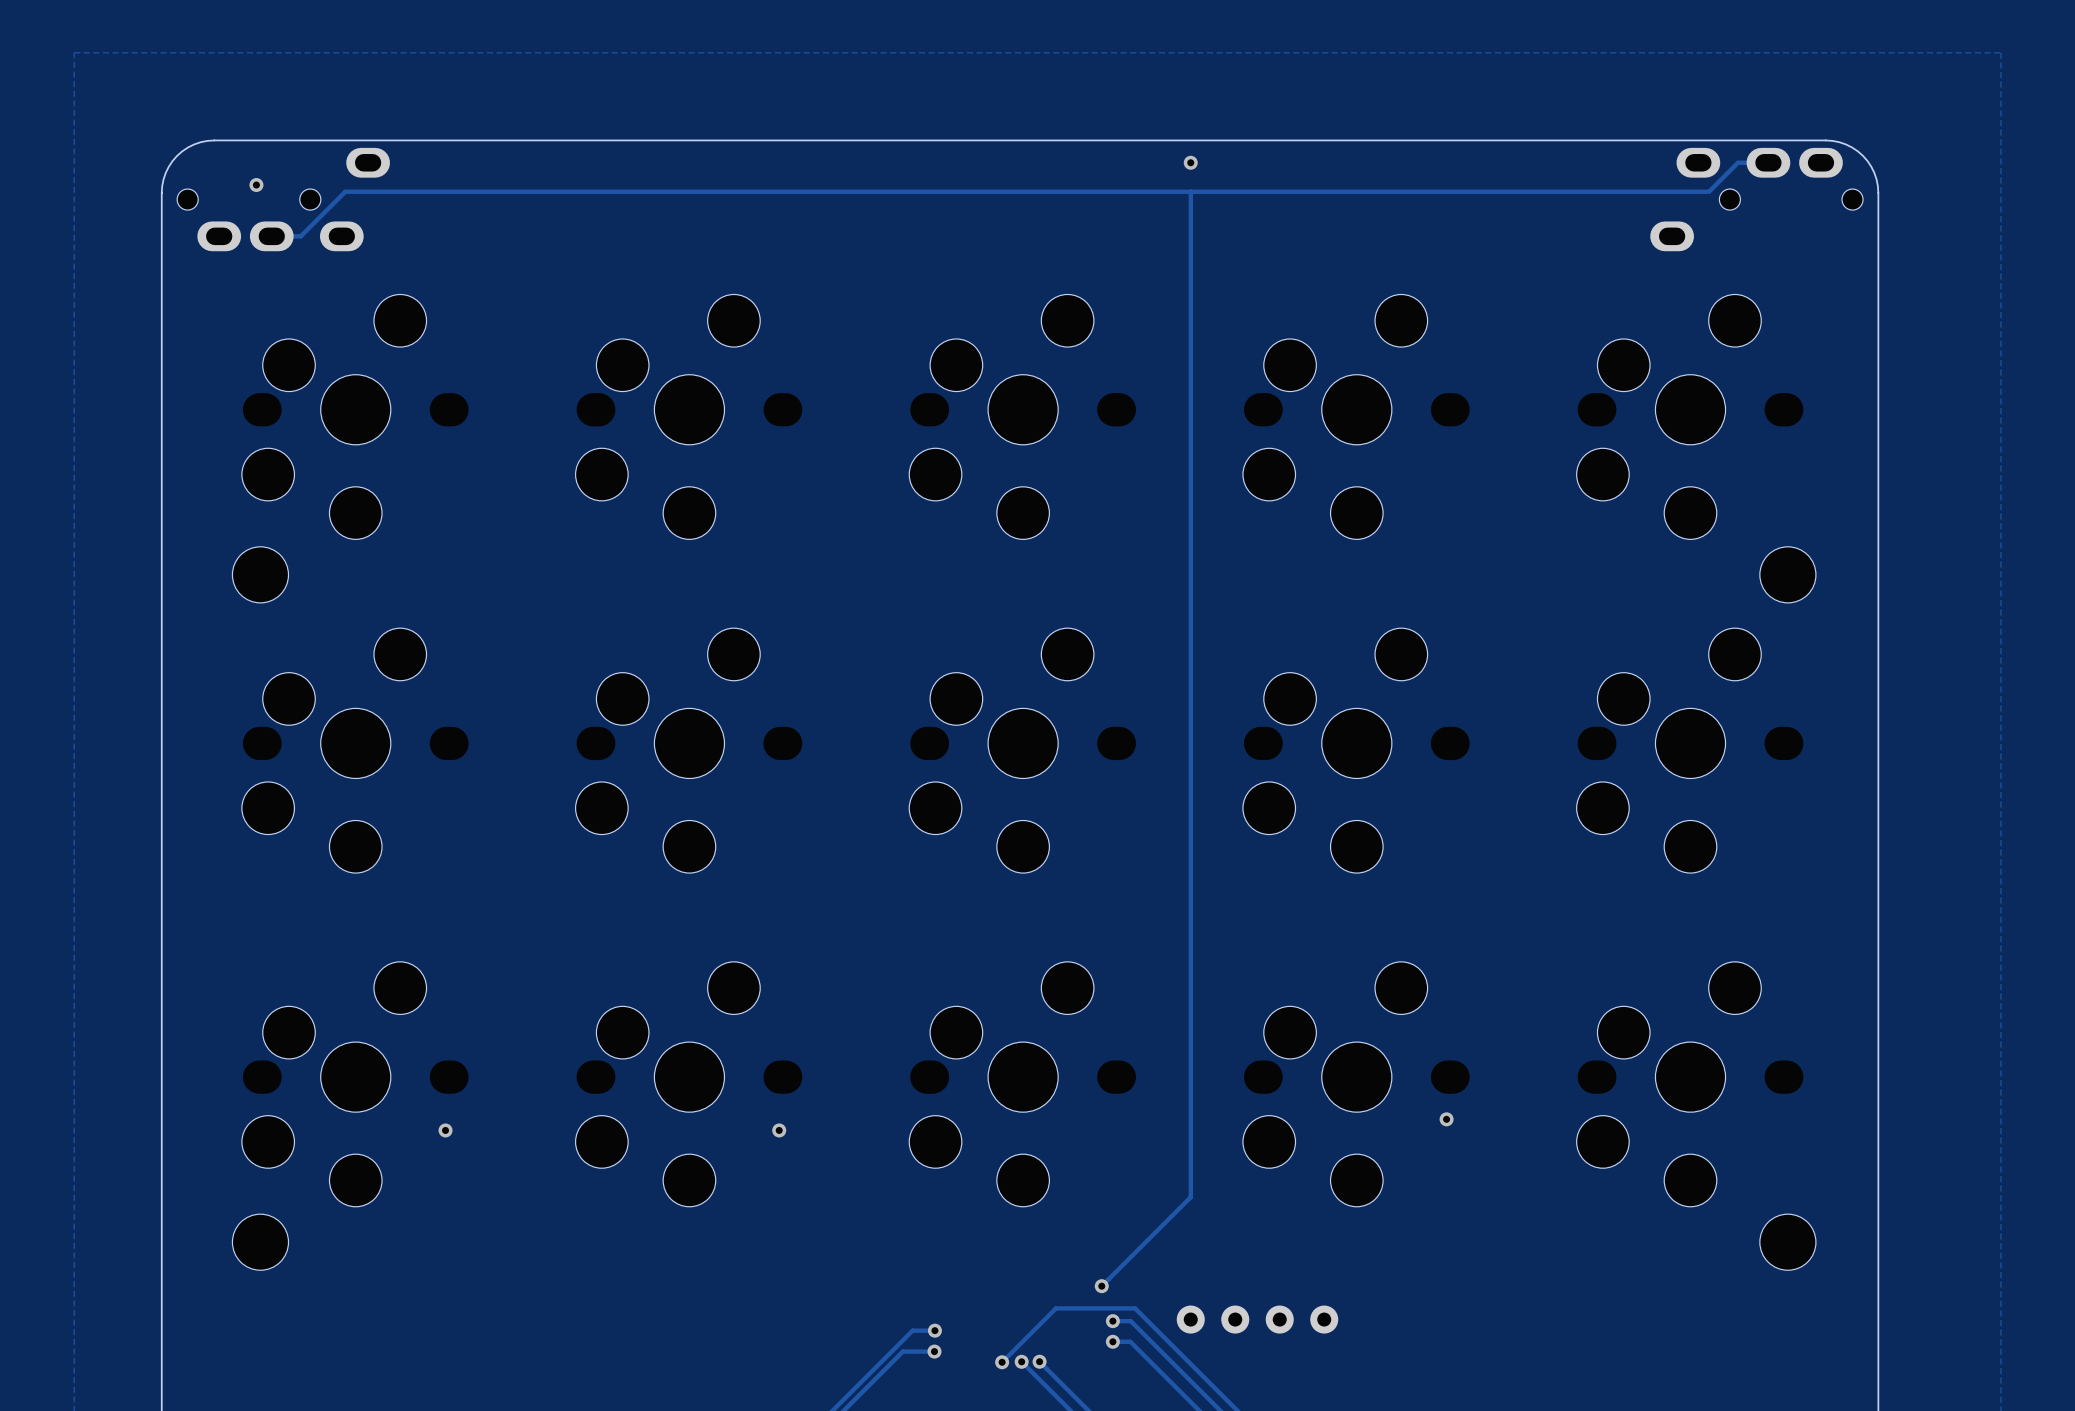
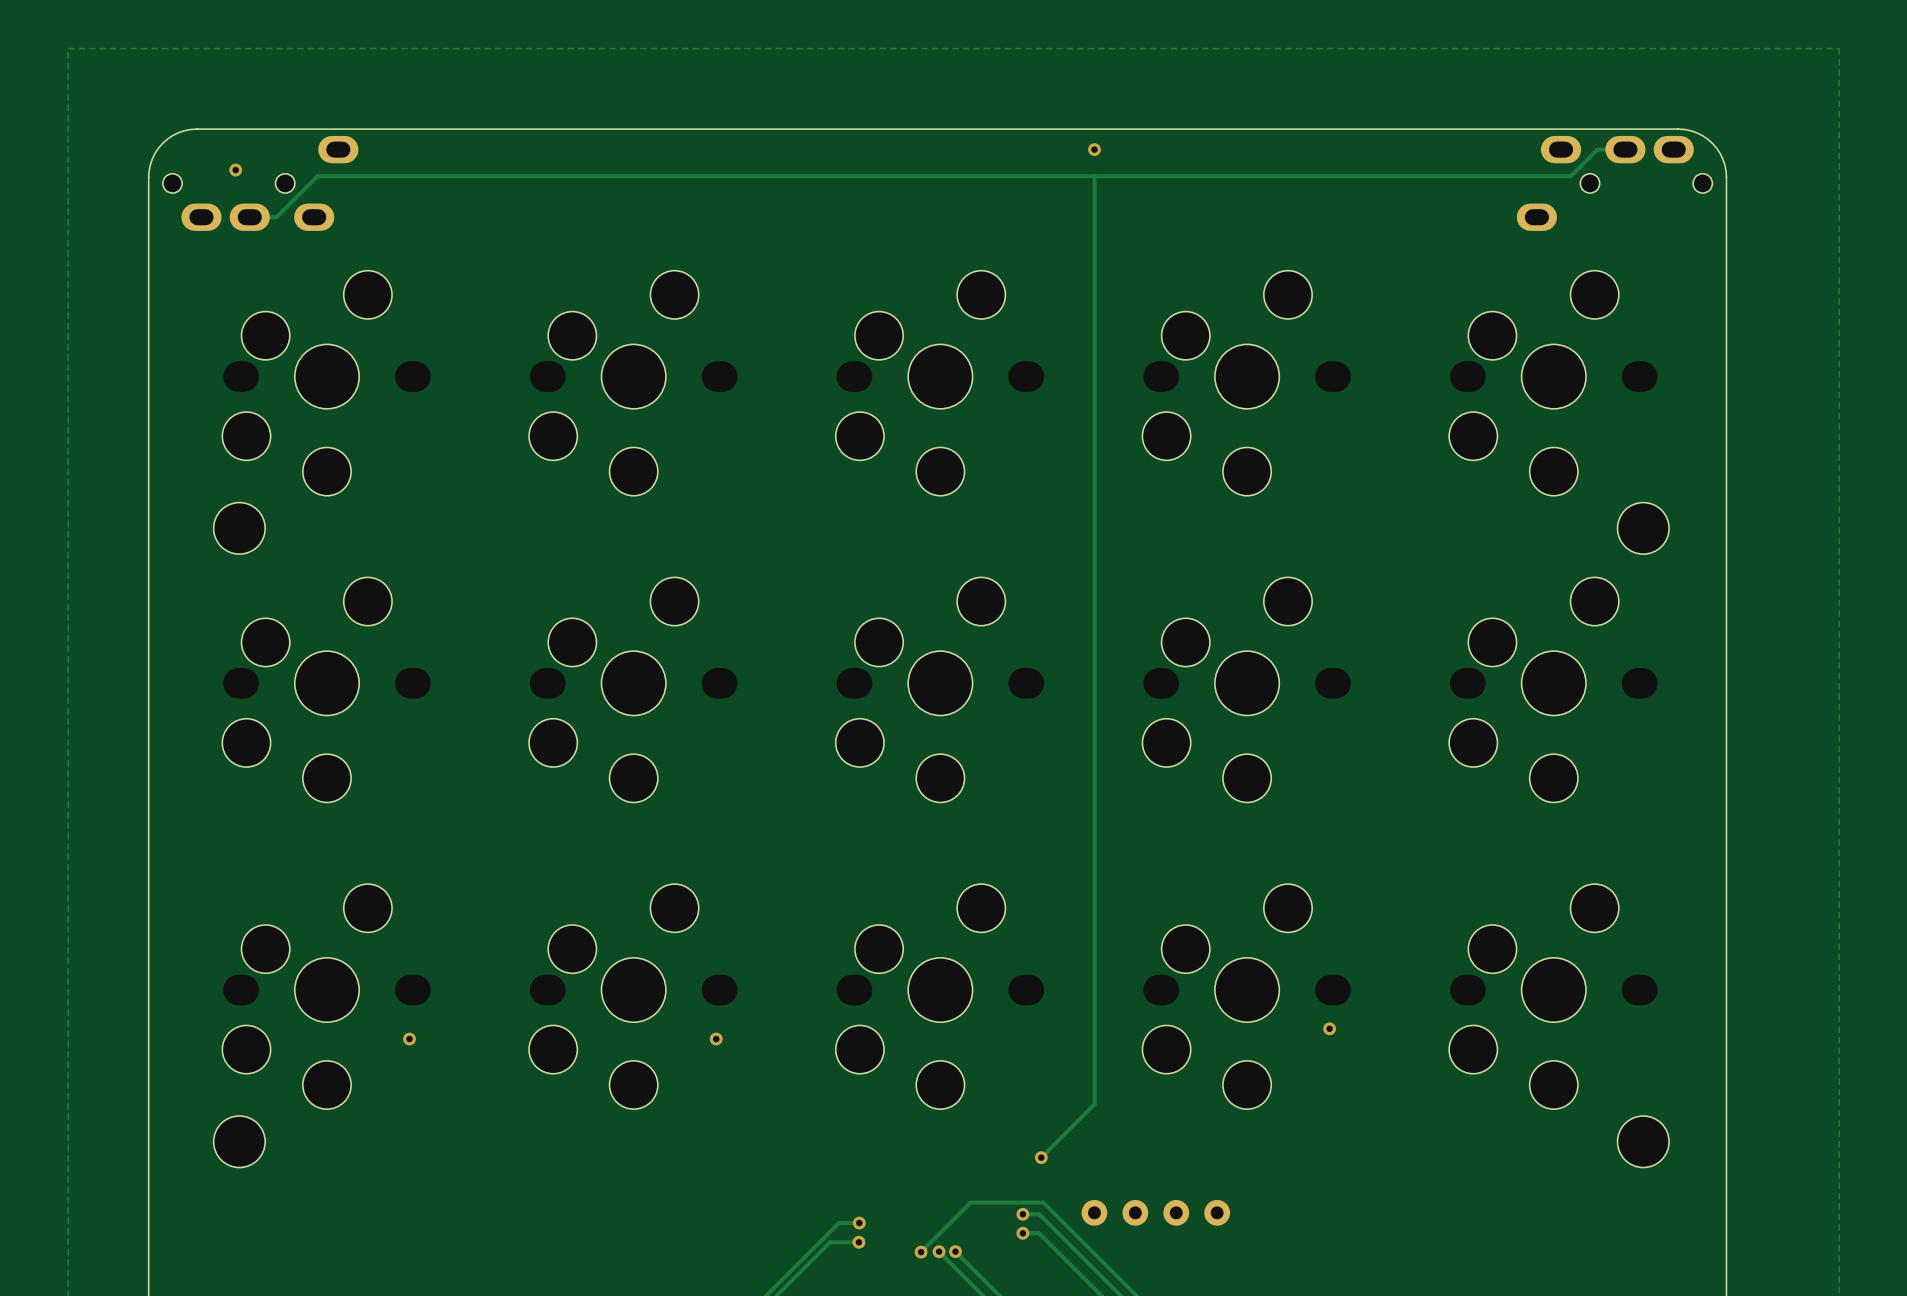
track: (1190, 1197) (1101, 1286) -> (1094, 1100) (1094, 1104) (1041, 1157)
via position: (1101, 1286) -> (1041, 1157)

